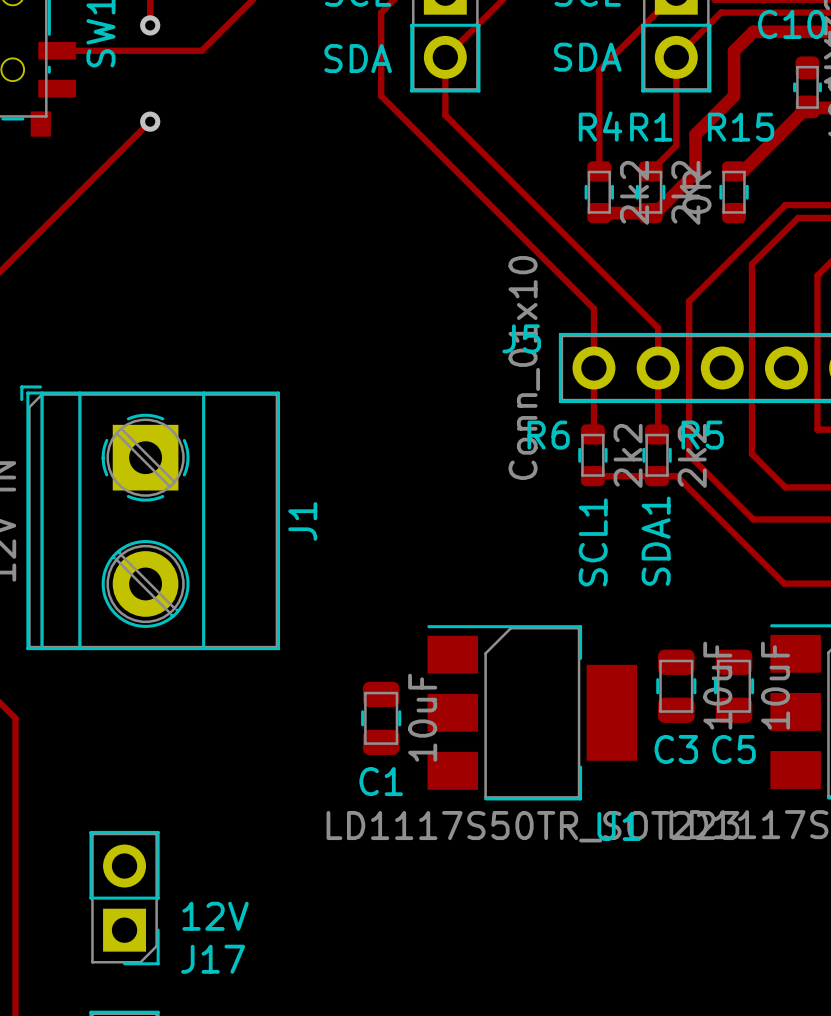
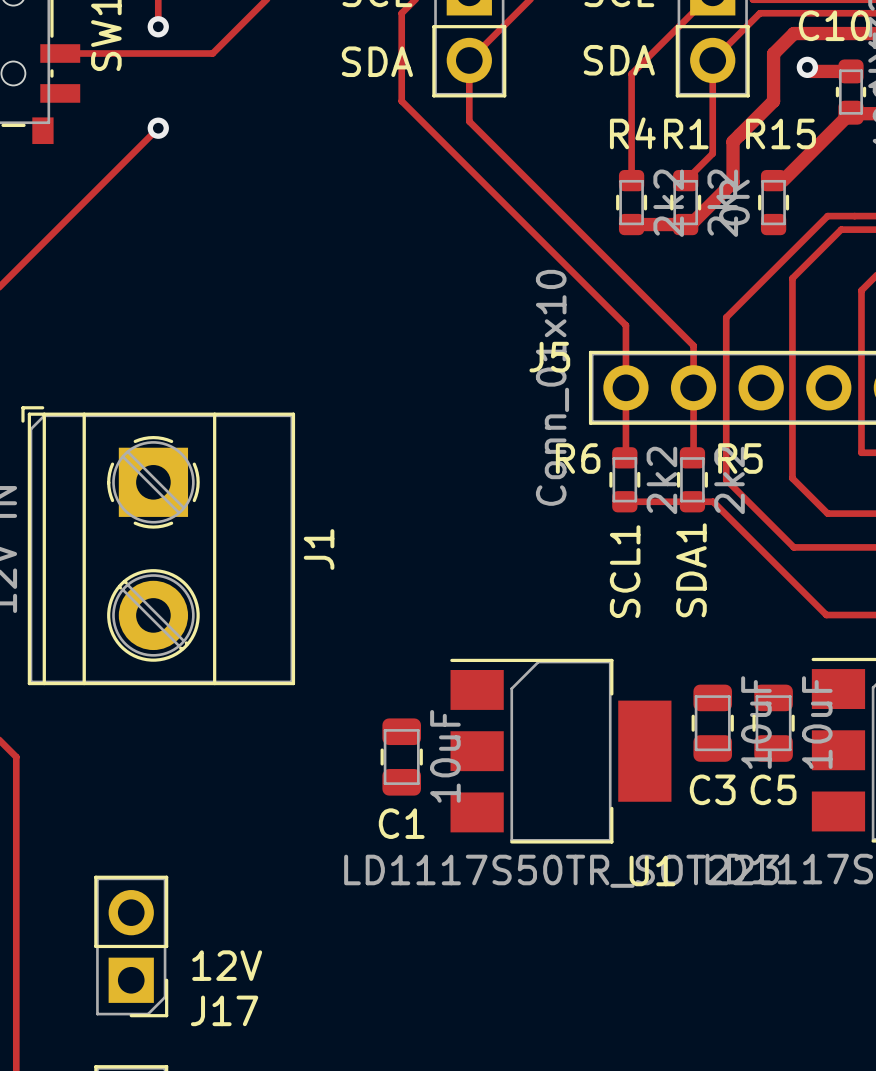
track: none -> (807, 67) (811, 71) (850, 71)
via: none -> (807, 67)

